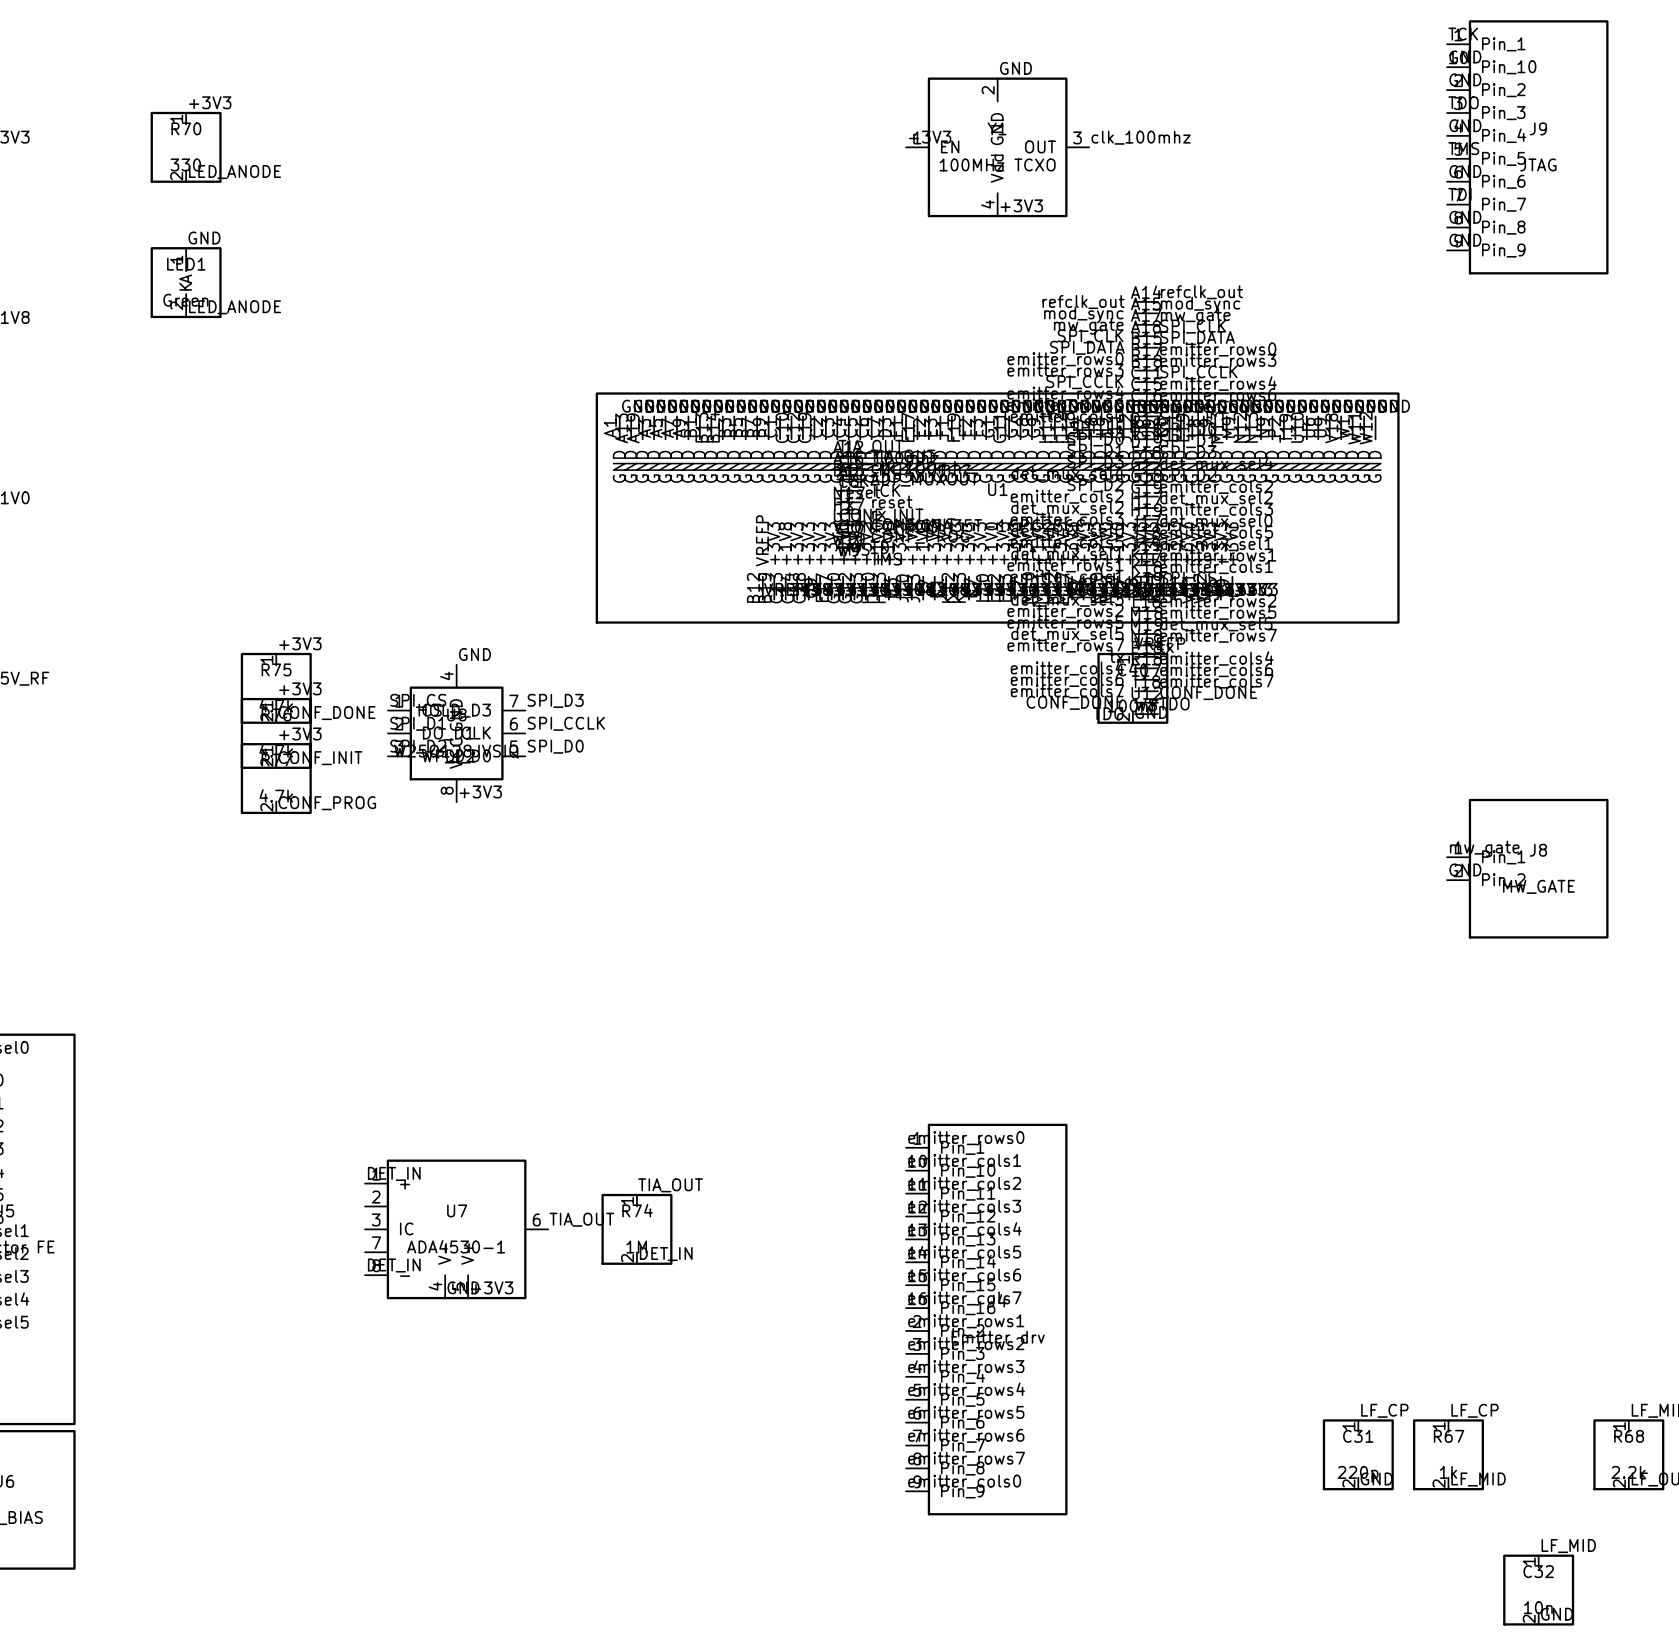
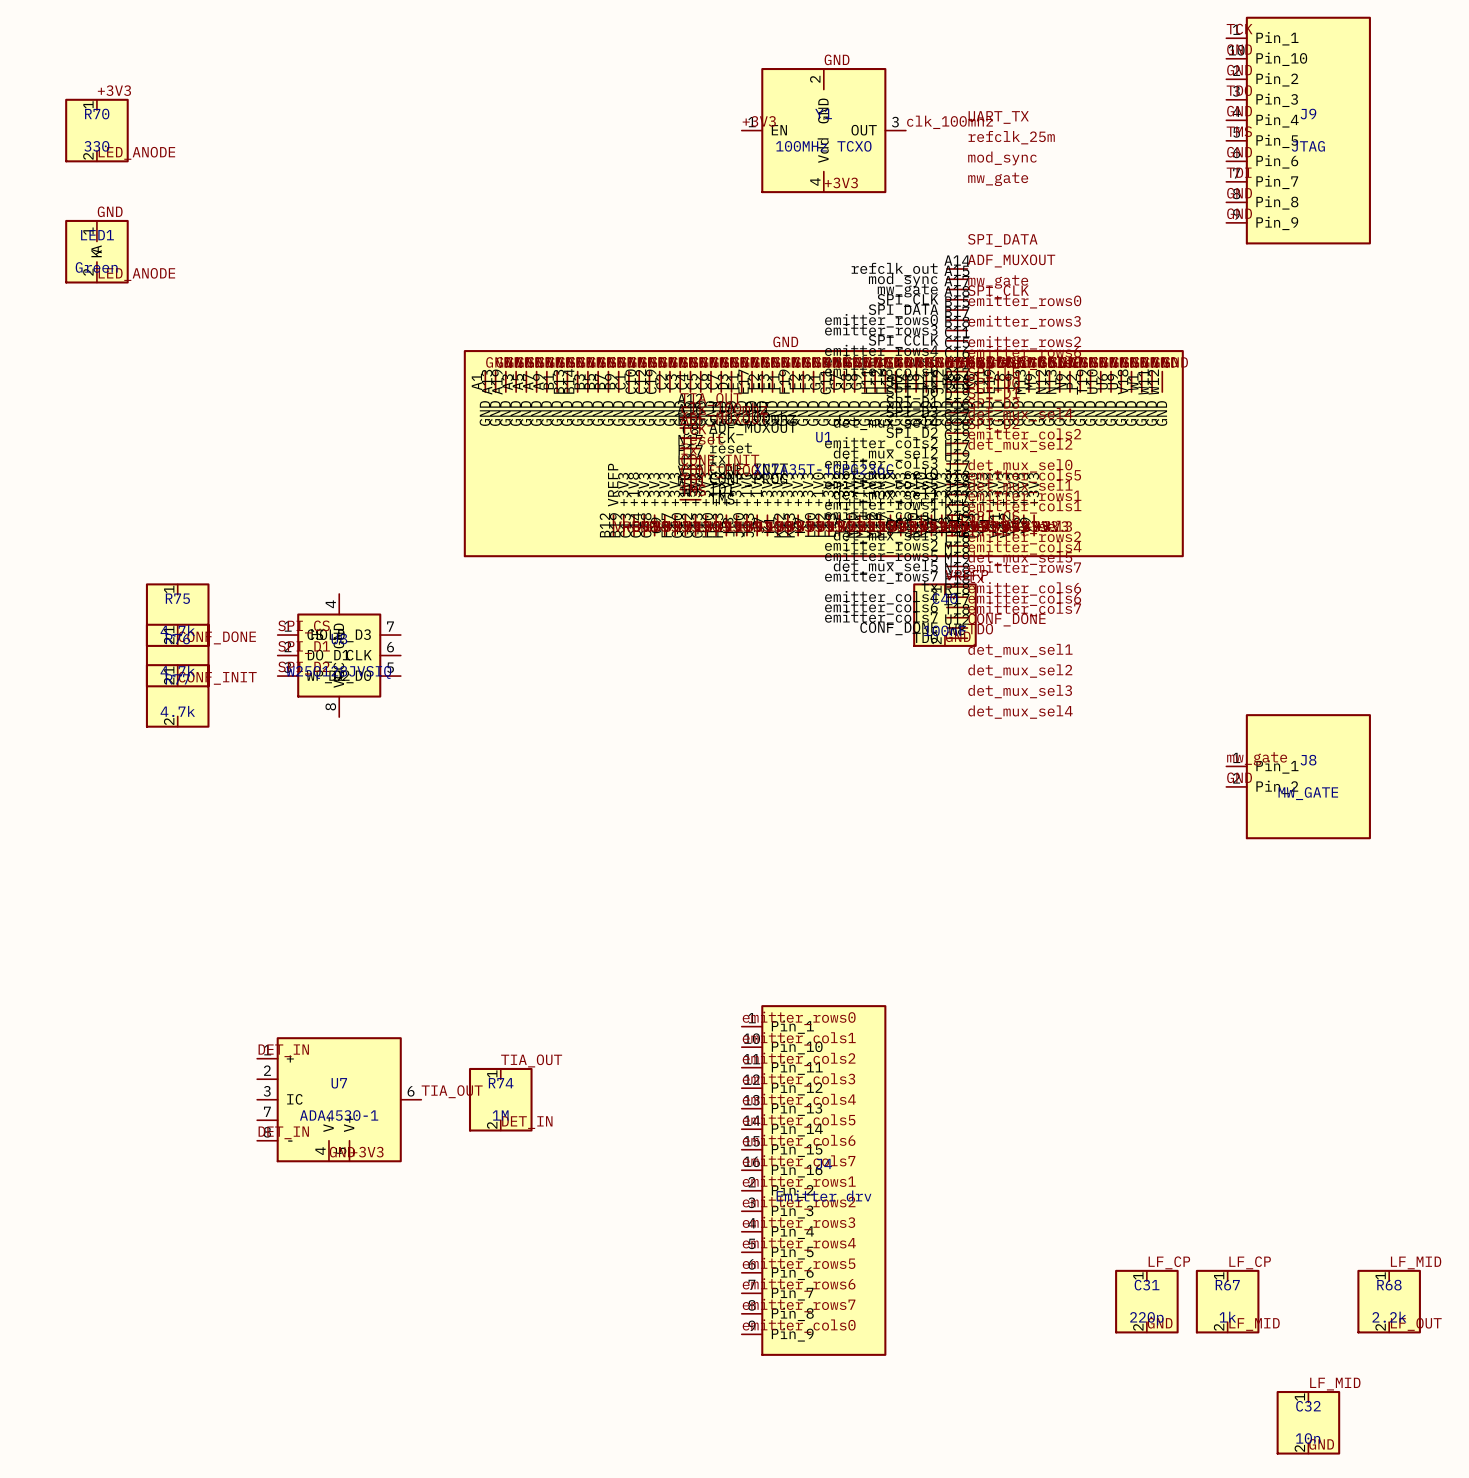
label: none -> UART_TX (998, 117)
label: none -> refclk_25m (1011, 137)
label: none -> mw_gate (998, 179)
label: none -> SPI_DATA (1002, 240)
label: refclk_out (1201, 292) -> ADF_MUXOUT (1011, 261)
label position: mod_sync (1200, 305) -> mod_sync (1002, 158)
label: SPI_DATA (1197, 338) -> emitter_rows0 (1024, 301)
label: emitter_rows0 (1218, 349) -> none
label: SPI_CCLK (1198, 372) -> none
label: none -> GND (785, 341)
label: emitter_rows4 (1218, 383) -> emitter_rows2 (1024, 342)
label: emitter_cols3 (1216, 509) -> none
label: emitter_rows5 (1218, 612) -> emitter_cols4 (1024, 547)
label: +3V3 (300, 643) -> none
label: GND (474, 654) -> none
label: emitter_cols4 (1216, 658) -> emitter_cols6 (1024, 588)
label: +3V3 (300, 688) -> none
label: SPI_D3 (555, 700) -> none
label: SPI_CCLK (566, 723) -> none
label: none -> det_mux_sel1 (1020, 650)
label: +3V3 (300, 733) -> none
label: SPI_D0 (555, 746) -> none
label: none -> det_mux_sel2 (1020, 671)
label: none -> det_mux_sel3 (1020, 691)
label: +3V3 (480, 791) -> none
label: none -> det_mux_sel4 (1020, 712)
label: CONF_PROG (327, 803) -> none

